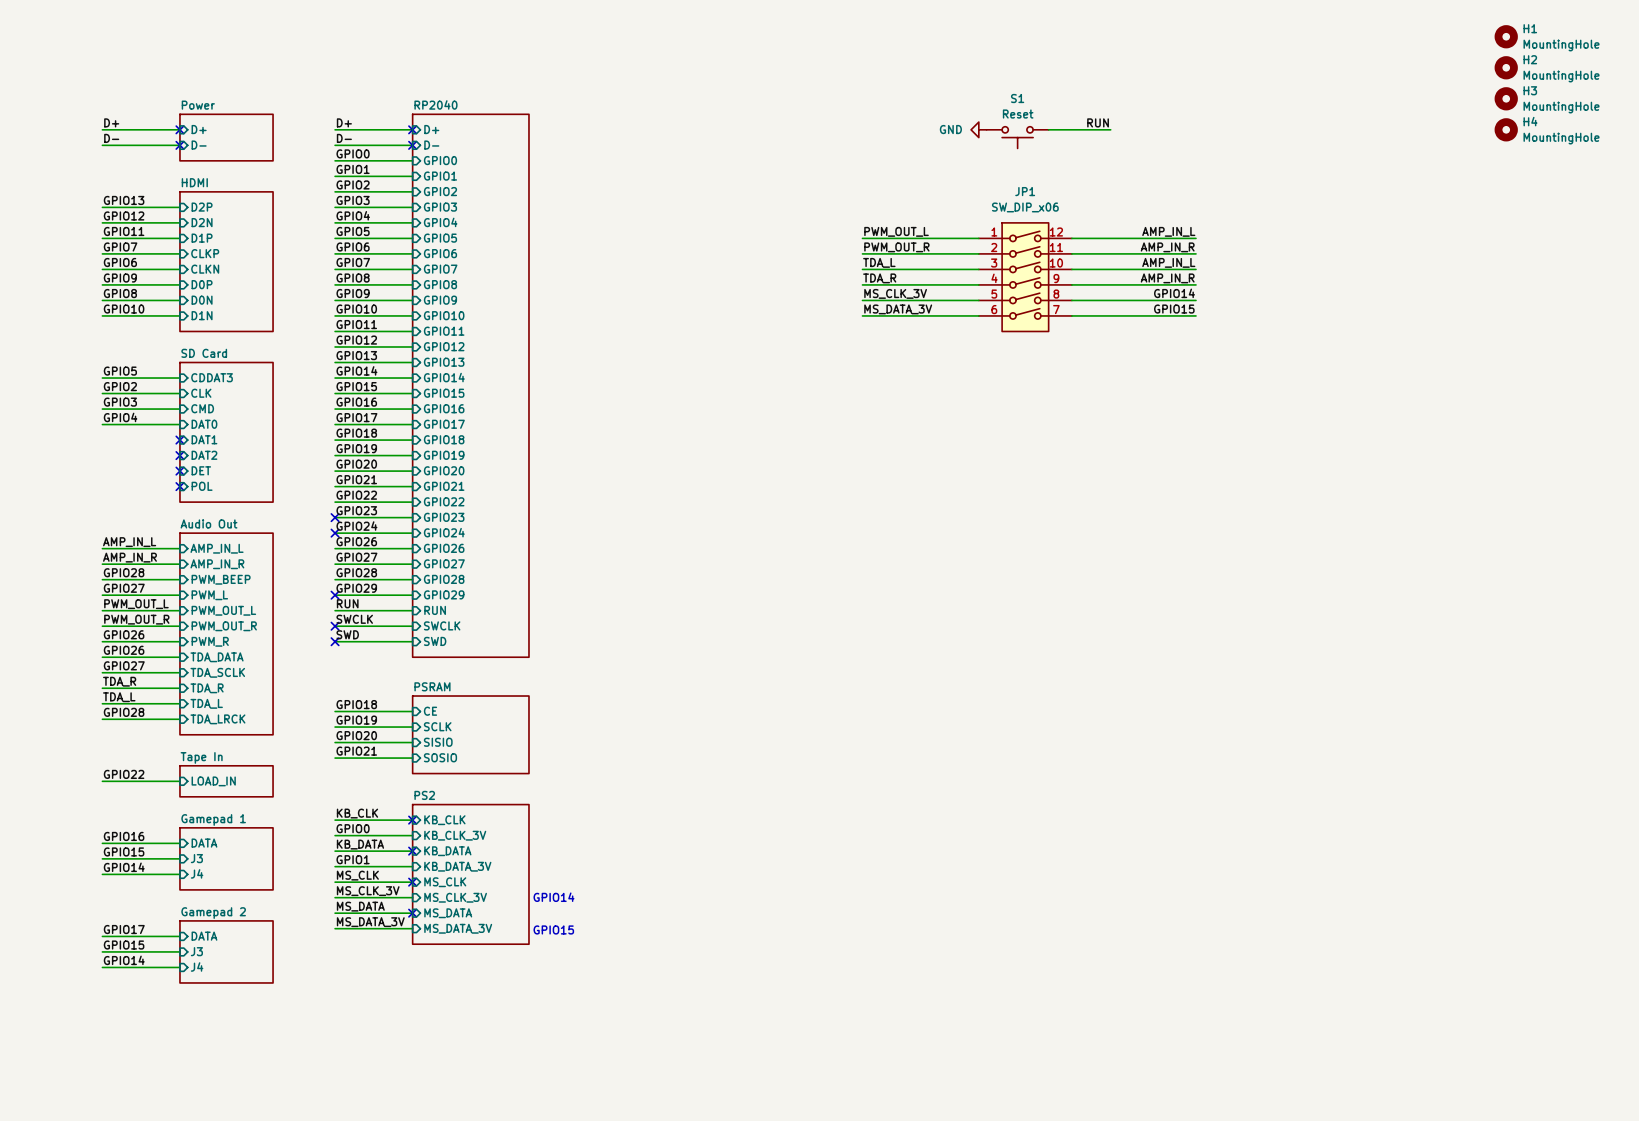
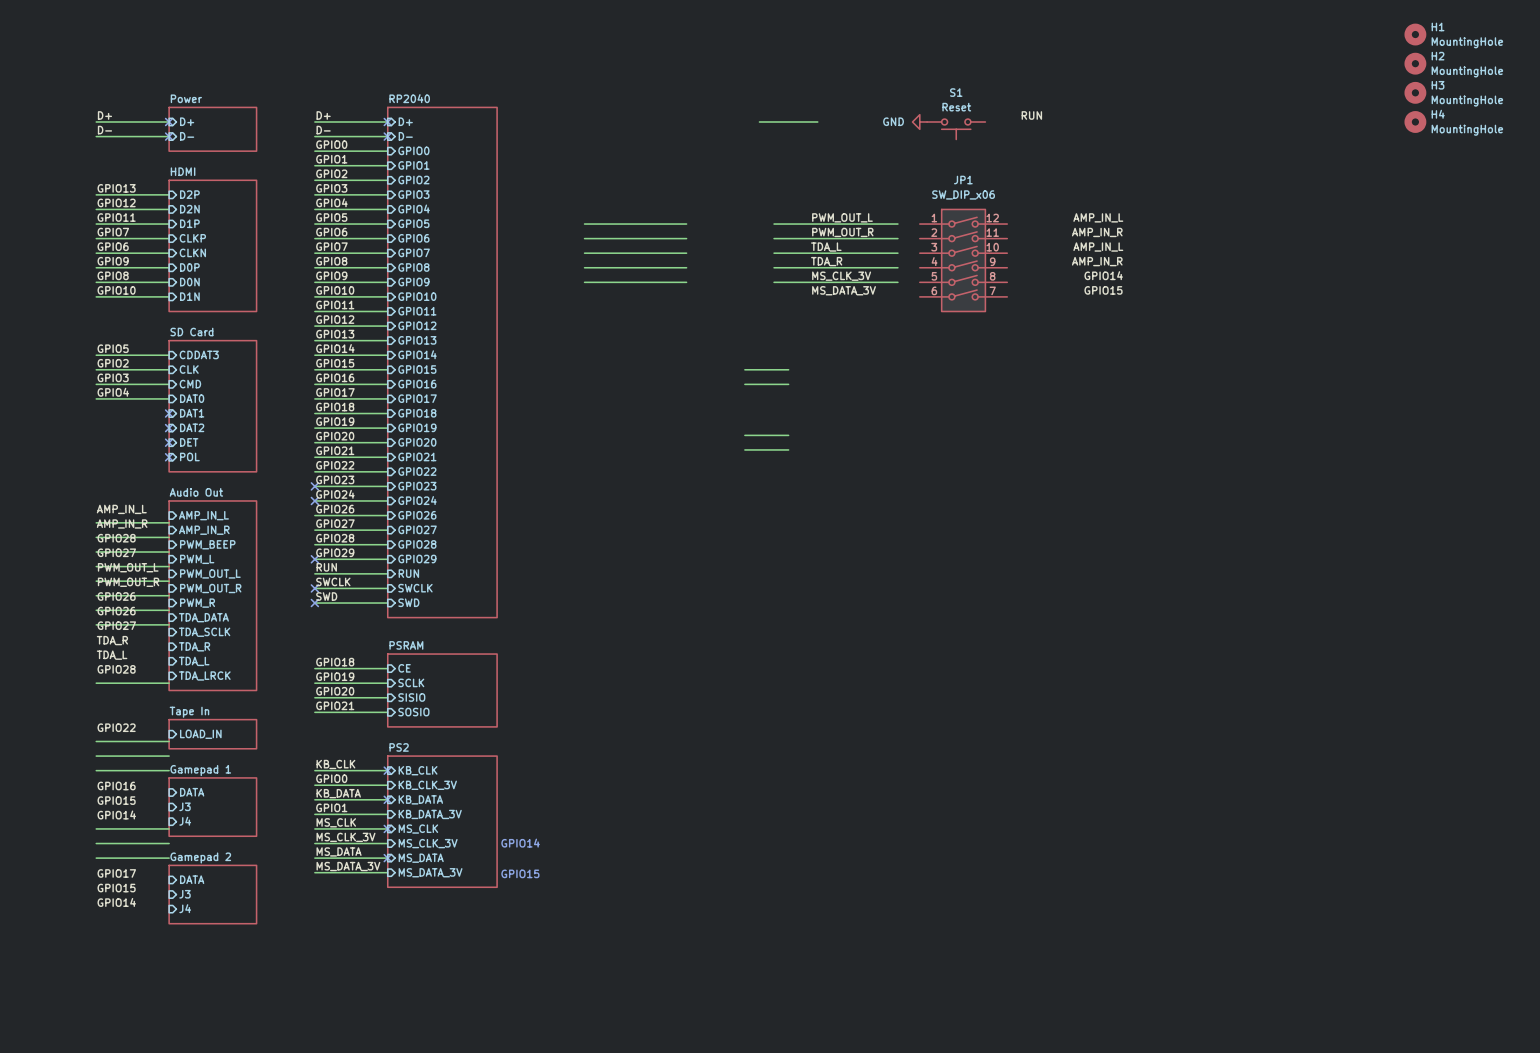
wire: none -> (759, 121) (817, 121)
wire: (1048, 129) (1110, 129) -> none
wire: none -> (584, 224) (686, 224)
wire: none -> (774, 224) (810, 224)
wire: (955, 238) (978, 238) -> none
wire: (1071, 238) (1195, 238) -> none
wire: none -> (584, 238) (686, 238)
wire: none -> (774, 238) (810, 238)
wire: (955, 253) (978, 253) -> none
wire: (1071, 253) (1195, 253) -> none
wire: none -> (584, 253) (686, 253)
wire: none -> (774, 253) (810, 253)
wire: (955, 269) (978, 269) -> none
wire: (1071, 269) (1195, 269) -> none
wire: none -> (584, 267) (686, 267)
wire: none -> (774, 267) (810, 267)
wire: (955, 284) (978, 284) -> none
wire: (1071, 284) (1195, 284) -> none
wire: none -> (584, 282) (686, 282)
wire: none -> (774, 282) (810, 282)
wire: (955, 300) (978, 300) -> none
wire: (1071, 300) (1195, 300) -> none
wire: (862, 315) (978, 315) -> none
wire: (1071, 315) (1195, 315) -> none
wire: none -> (744, 369) (788, 369)
wire: none -> (744, 384) (788, 384)
wire: none -> (744, 435) (788, 435)
wire: none -> (744, 449) (788, 449)
wire: (102, 548) (179, 548) -> none
wire: (102, 564) (179, 564) -> none
wire: (102, 579) (179, 579) -> none
wire: (102, 595) (179, 595) -> none
wire: (102, 610) (179, 610) -> (96, 522) (169, 522)
wire: (102, 626) (179, 626) -> (96, 537) (169, 537)
wire: (102, 641) (179, 641) -> (96, 552) (169, 552)
wire: (102, 657) (179, 657) -> (96, 566) (169, 566)
wire: (102, 672) (179, 672) -> (96, 581) (169, 581)
wire: (102, 688) (179, 688) -> (96, 595) (169, 595)
wire: (102, 703) (179, 703) -> (96, 610) (169, 610)
wire: (102, 719) (179, 719) -> (96, 624) (169, 624)
wire: (102, 781) (179, 781) -> (96, 683) (169, 683)
wire: (102, 843) (179, 843) -> (96, 741) (169, 741)
wire: (102, 858) (179, 858) -> (96, 756) (169, 756)
wire: (102, 874) (179, 874) -> (96, 770) (169, 770)
wire: (102, 936) (179, 936) -> (96, 828) (169, 828)
wire: (102, 951) (179, 951) -> (96, 843) (169, 843)
wire: (102, 967) (179, 967) -> (96, 858) (169, 858)

